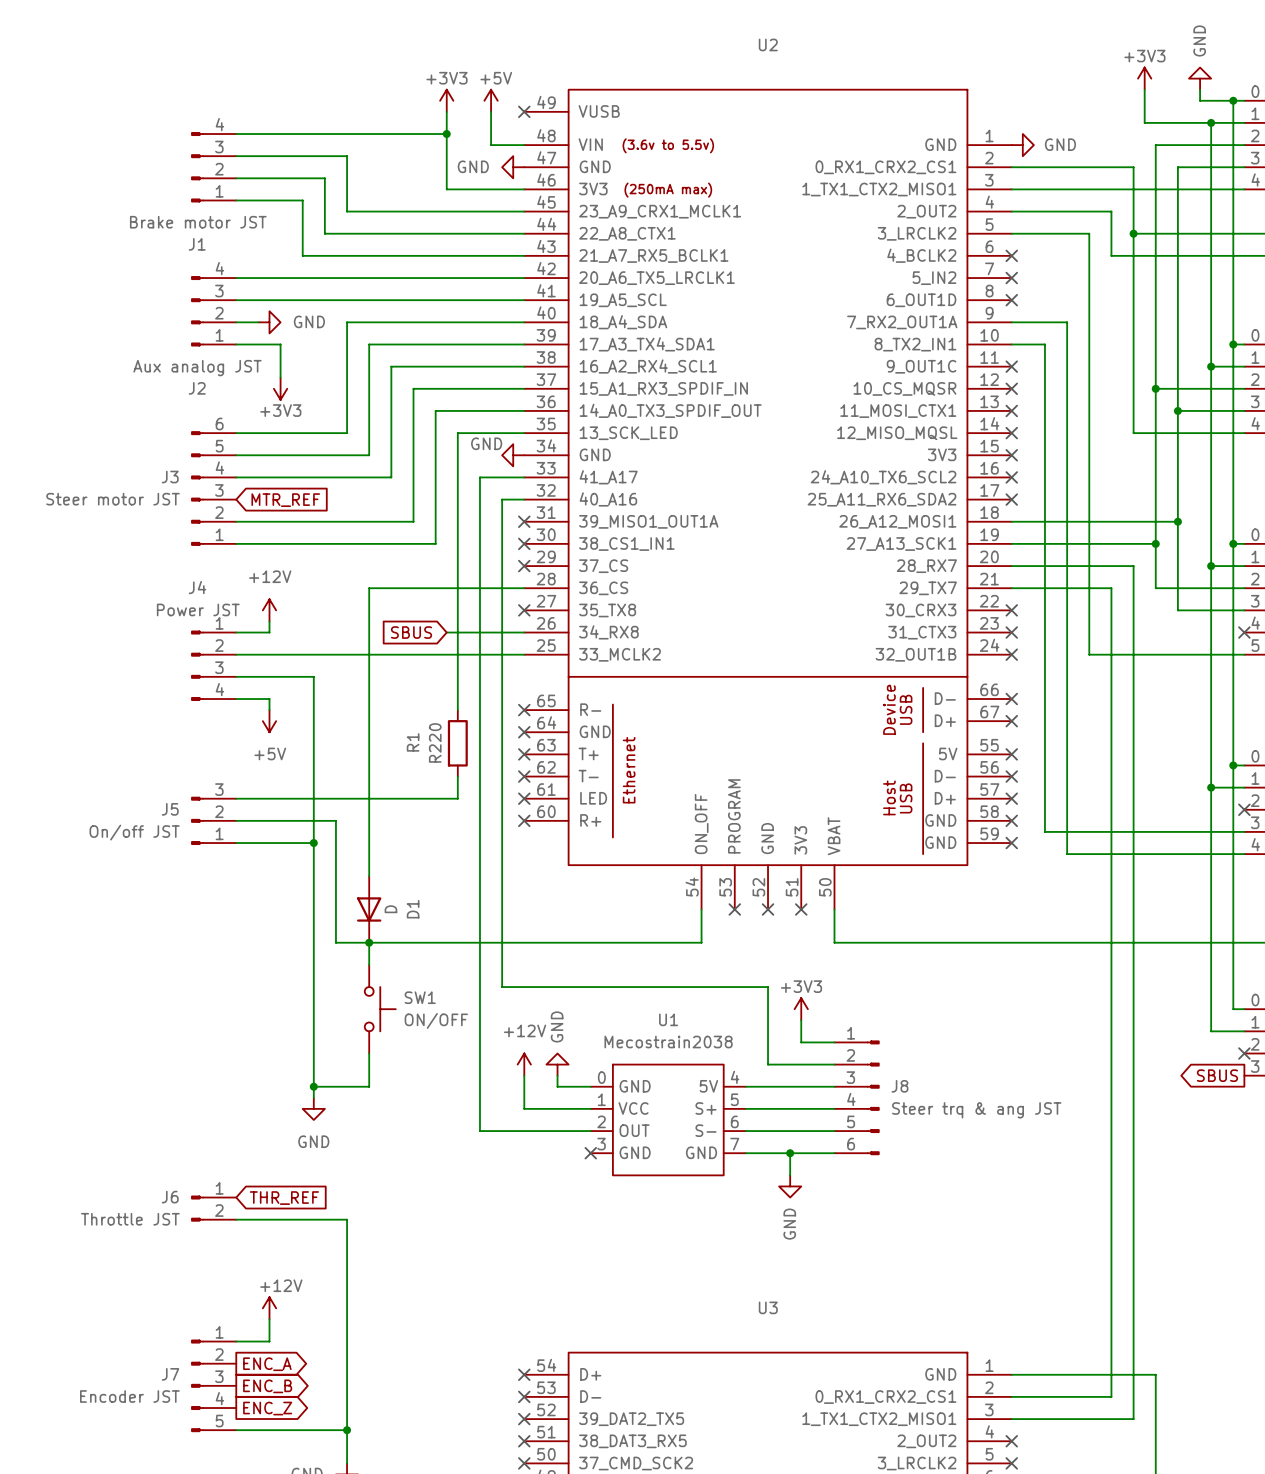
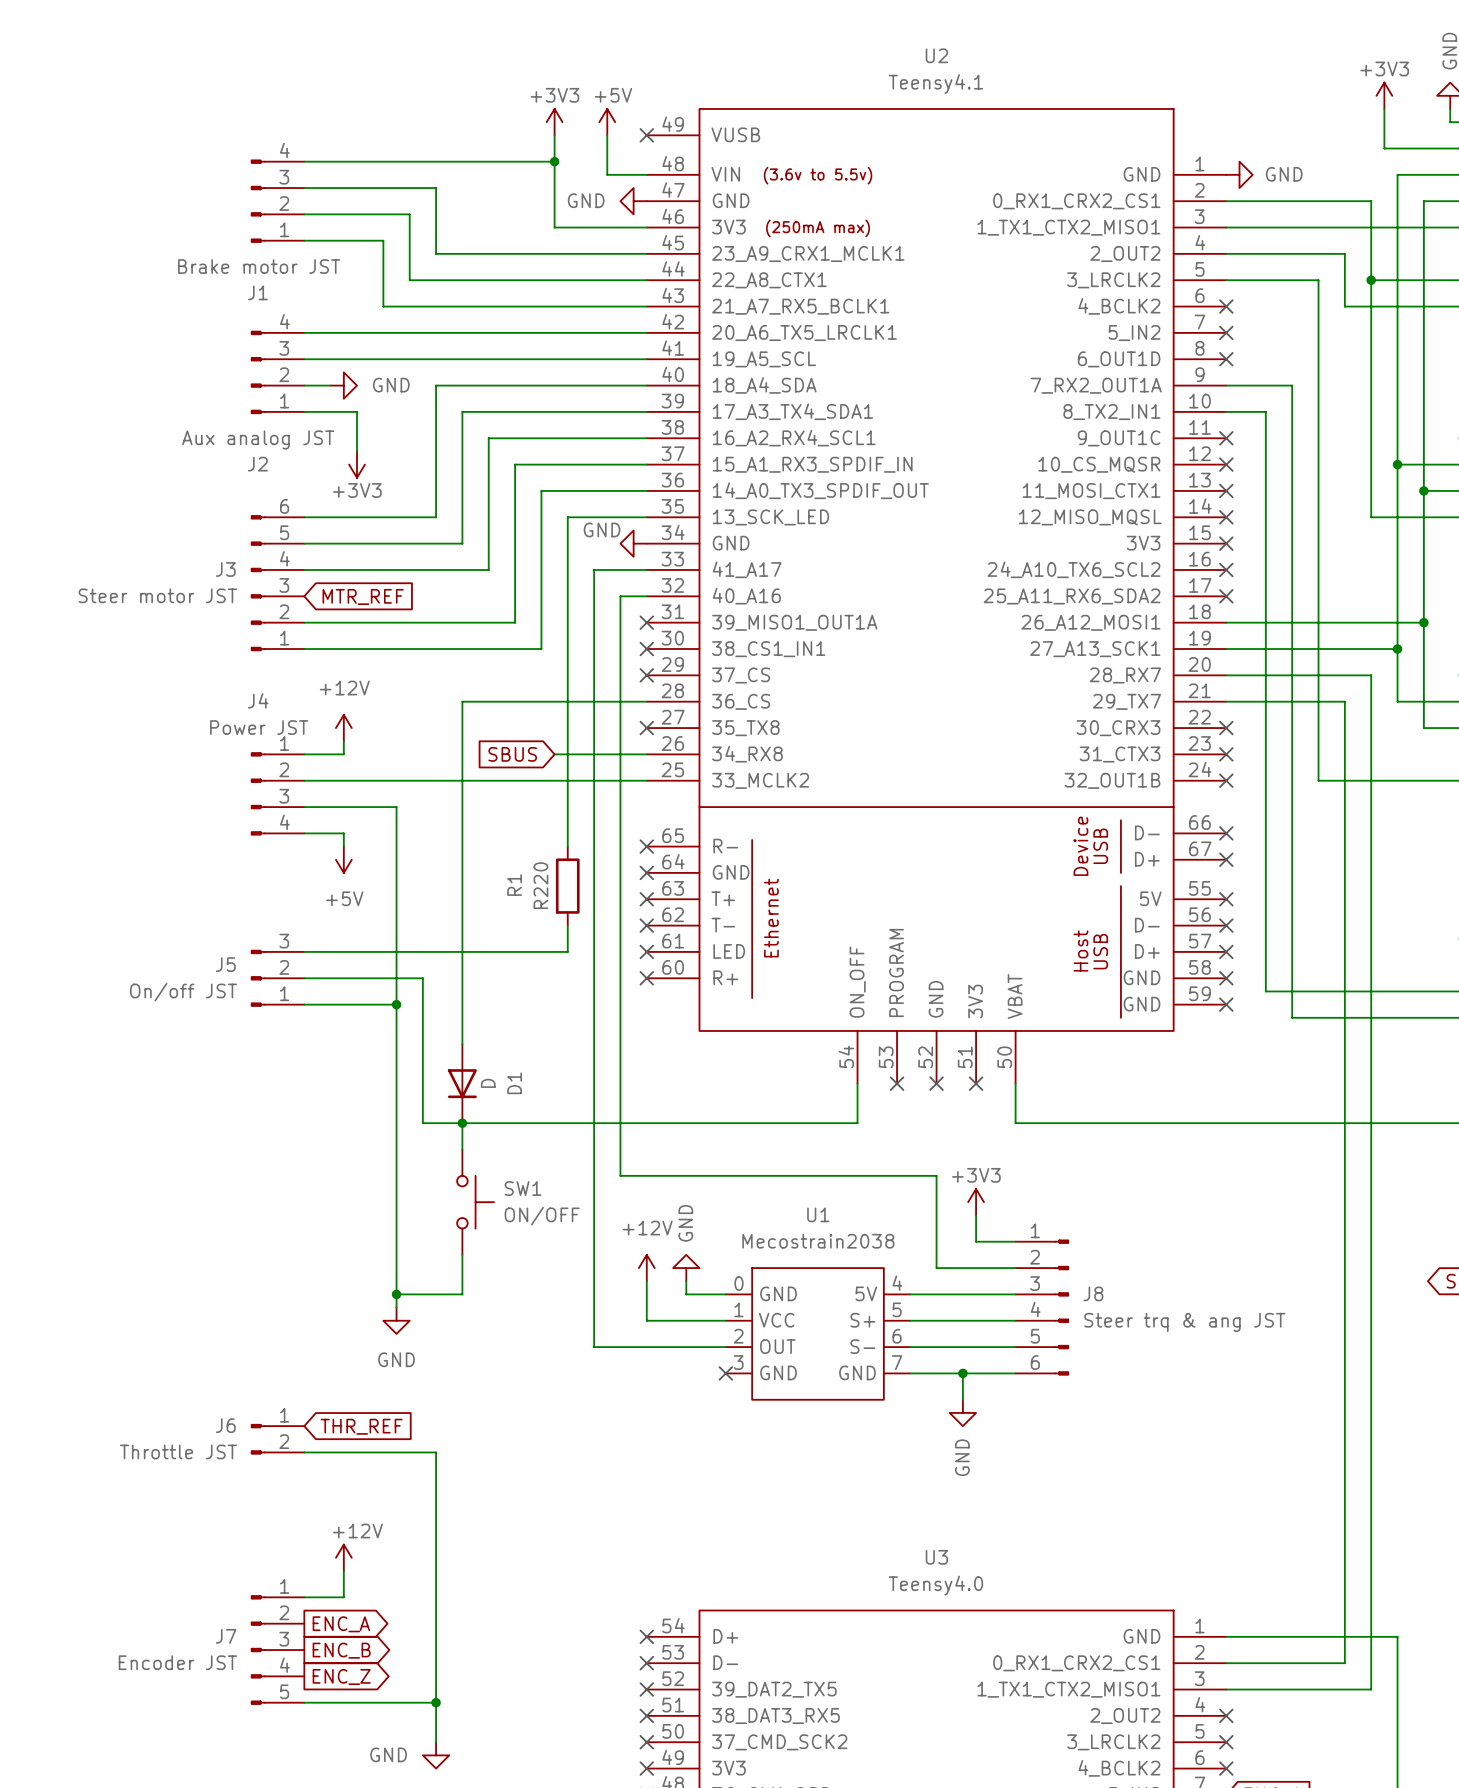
U2 value: none -> Teensy4.1 (935, 84)
U3 value: none -> Teensy4.0 (935, 1585)

